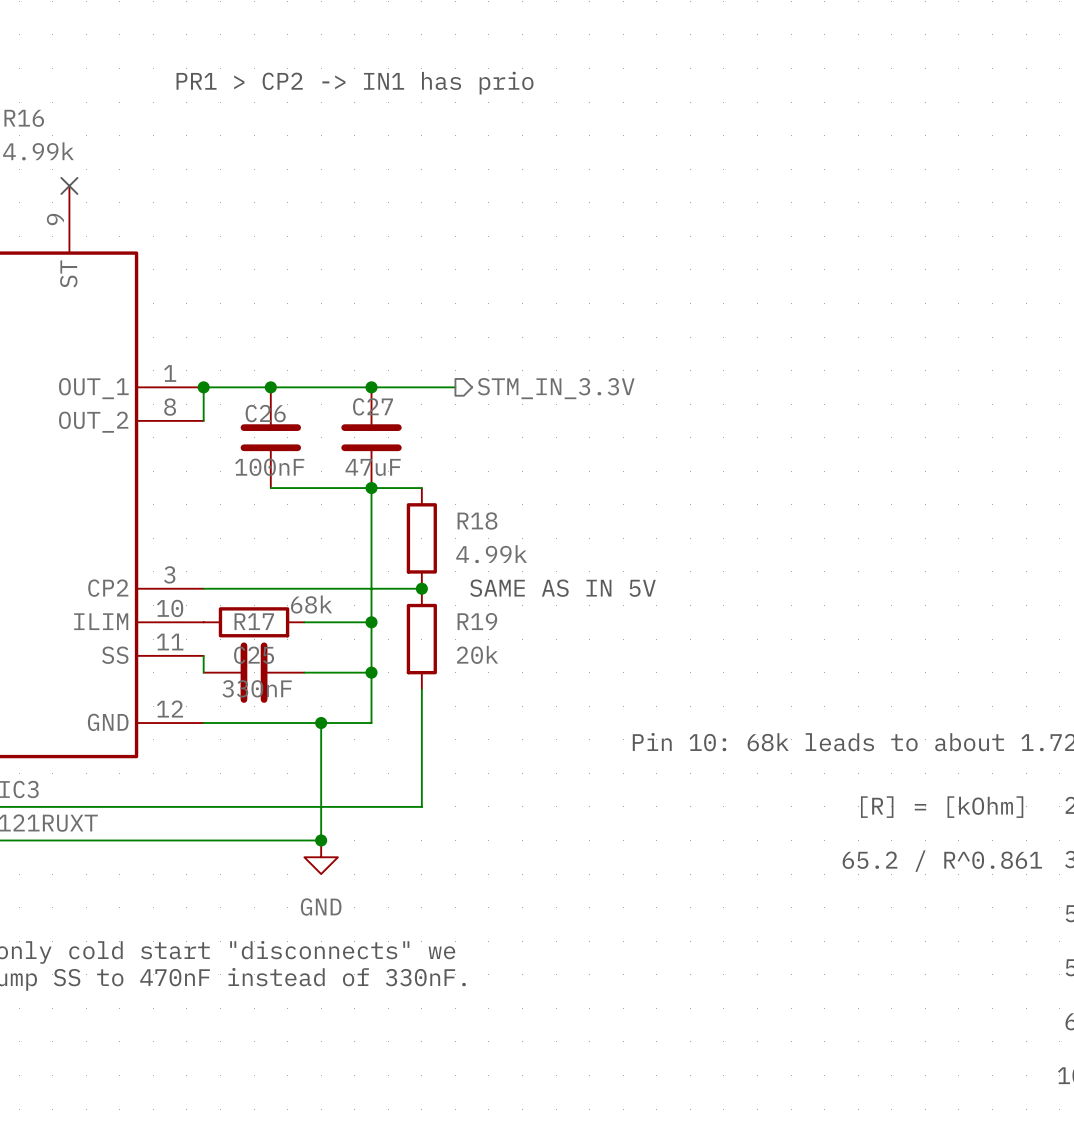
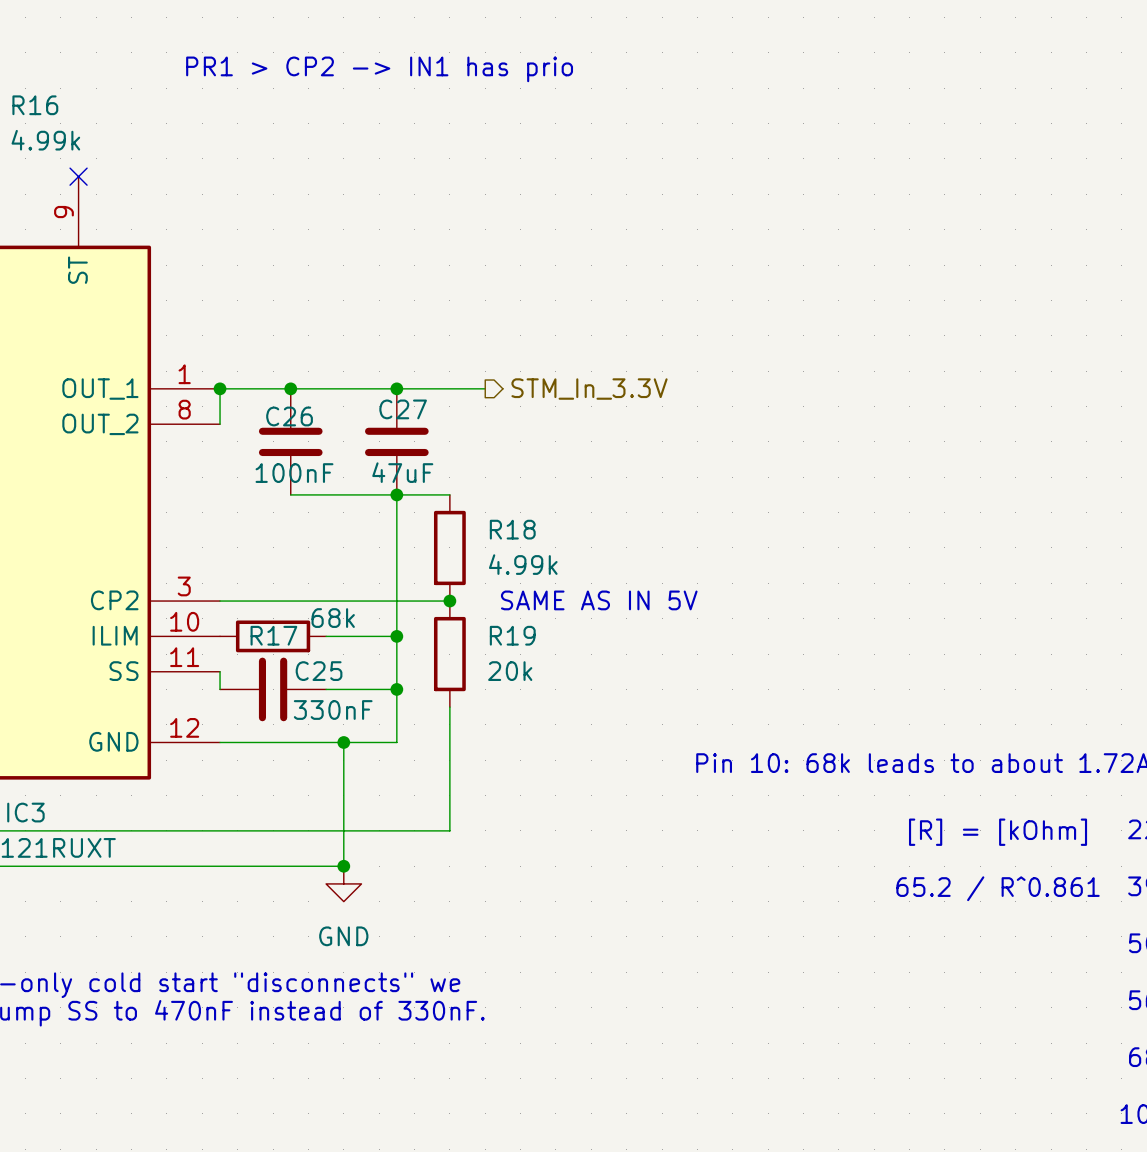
hierarchical label: STM_IN_3.3V (556, 388) -> STM_In_3.3V (589, 389)
C25 name position: C25 (254, 655) -> C25 (319, 671)
C25 value position: 330nF (257, 688) -> 330nF (333, 709)

